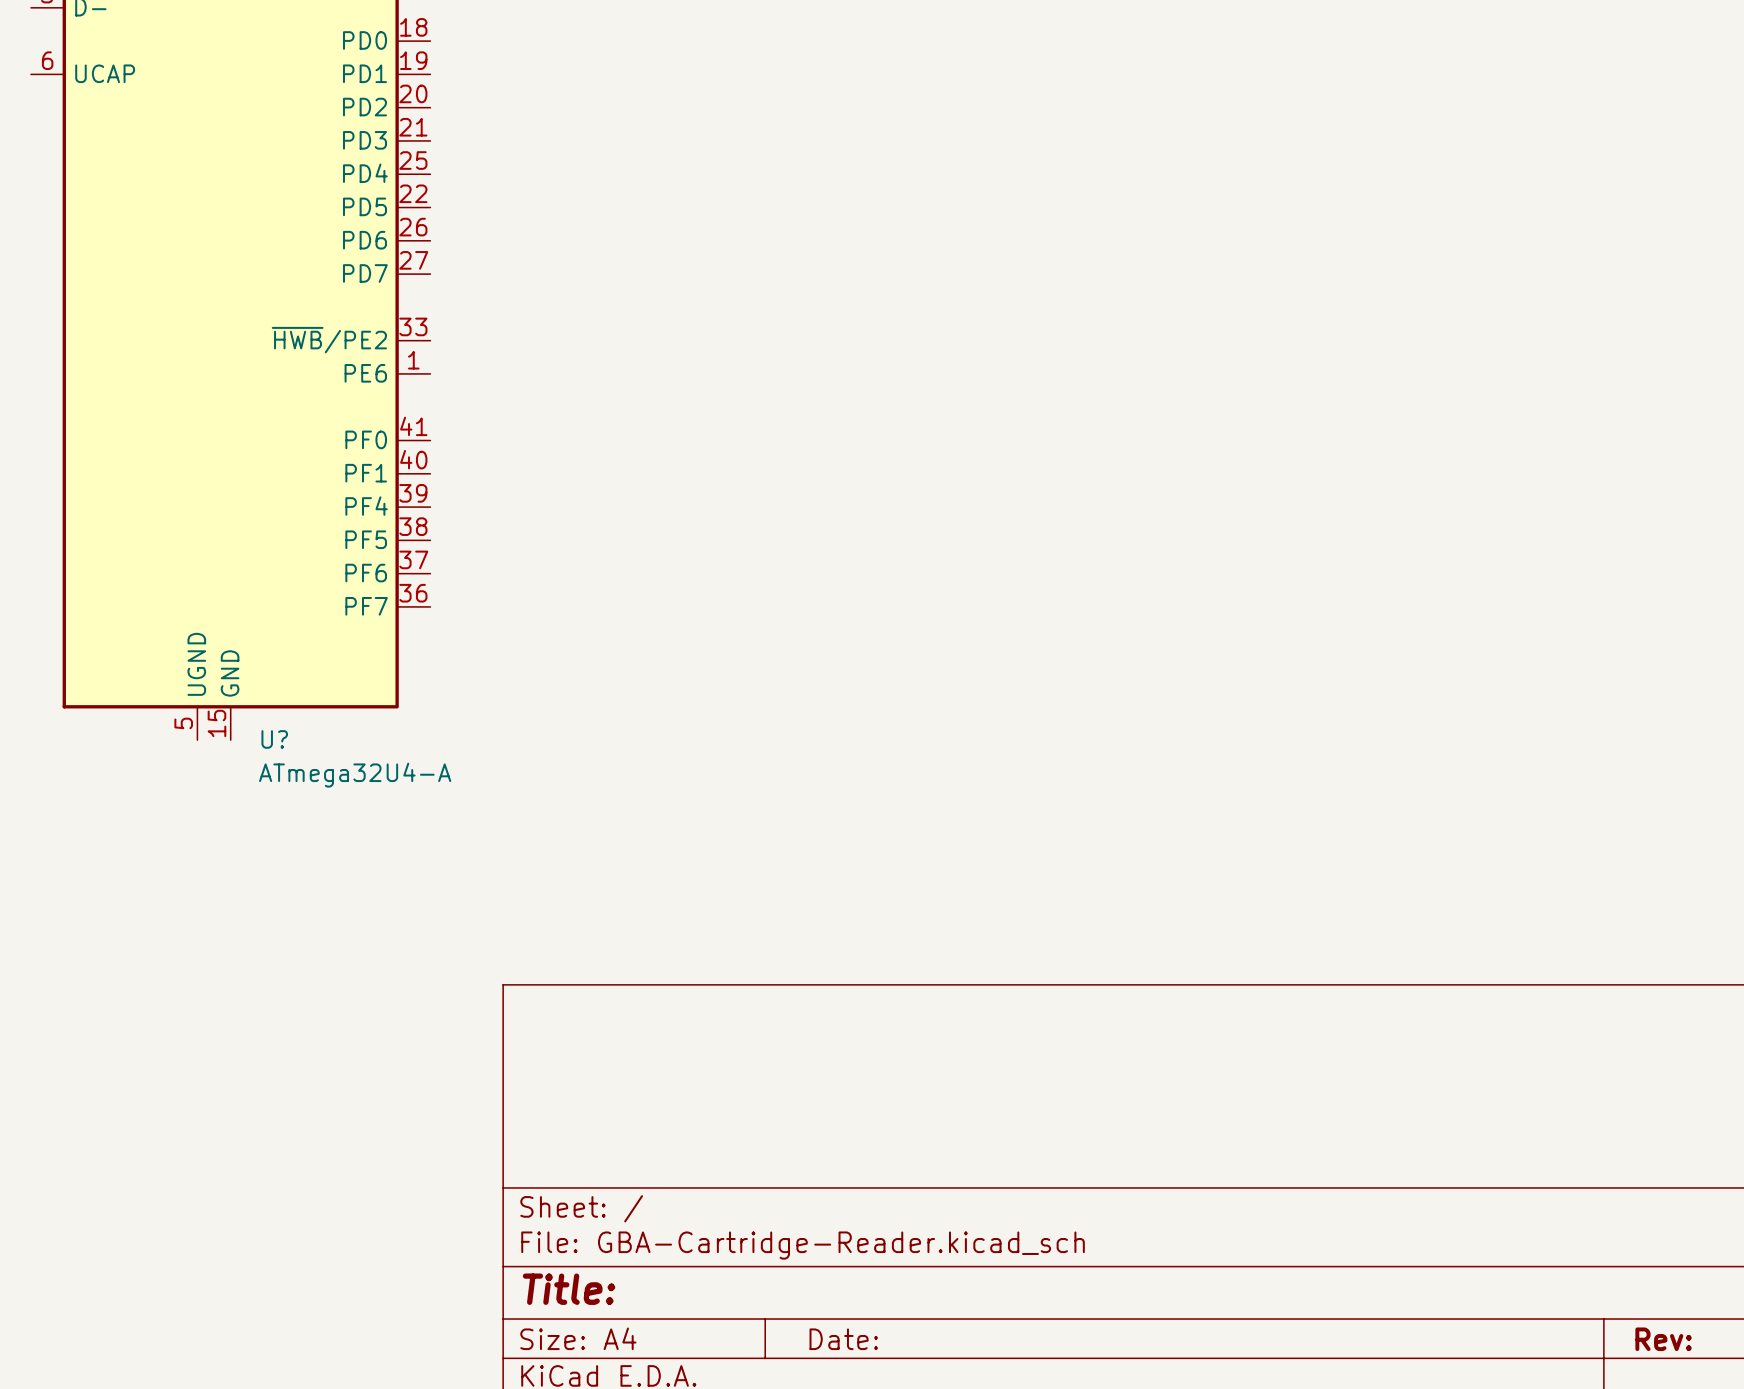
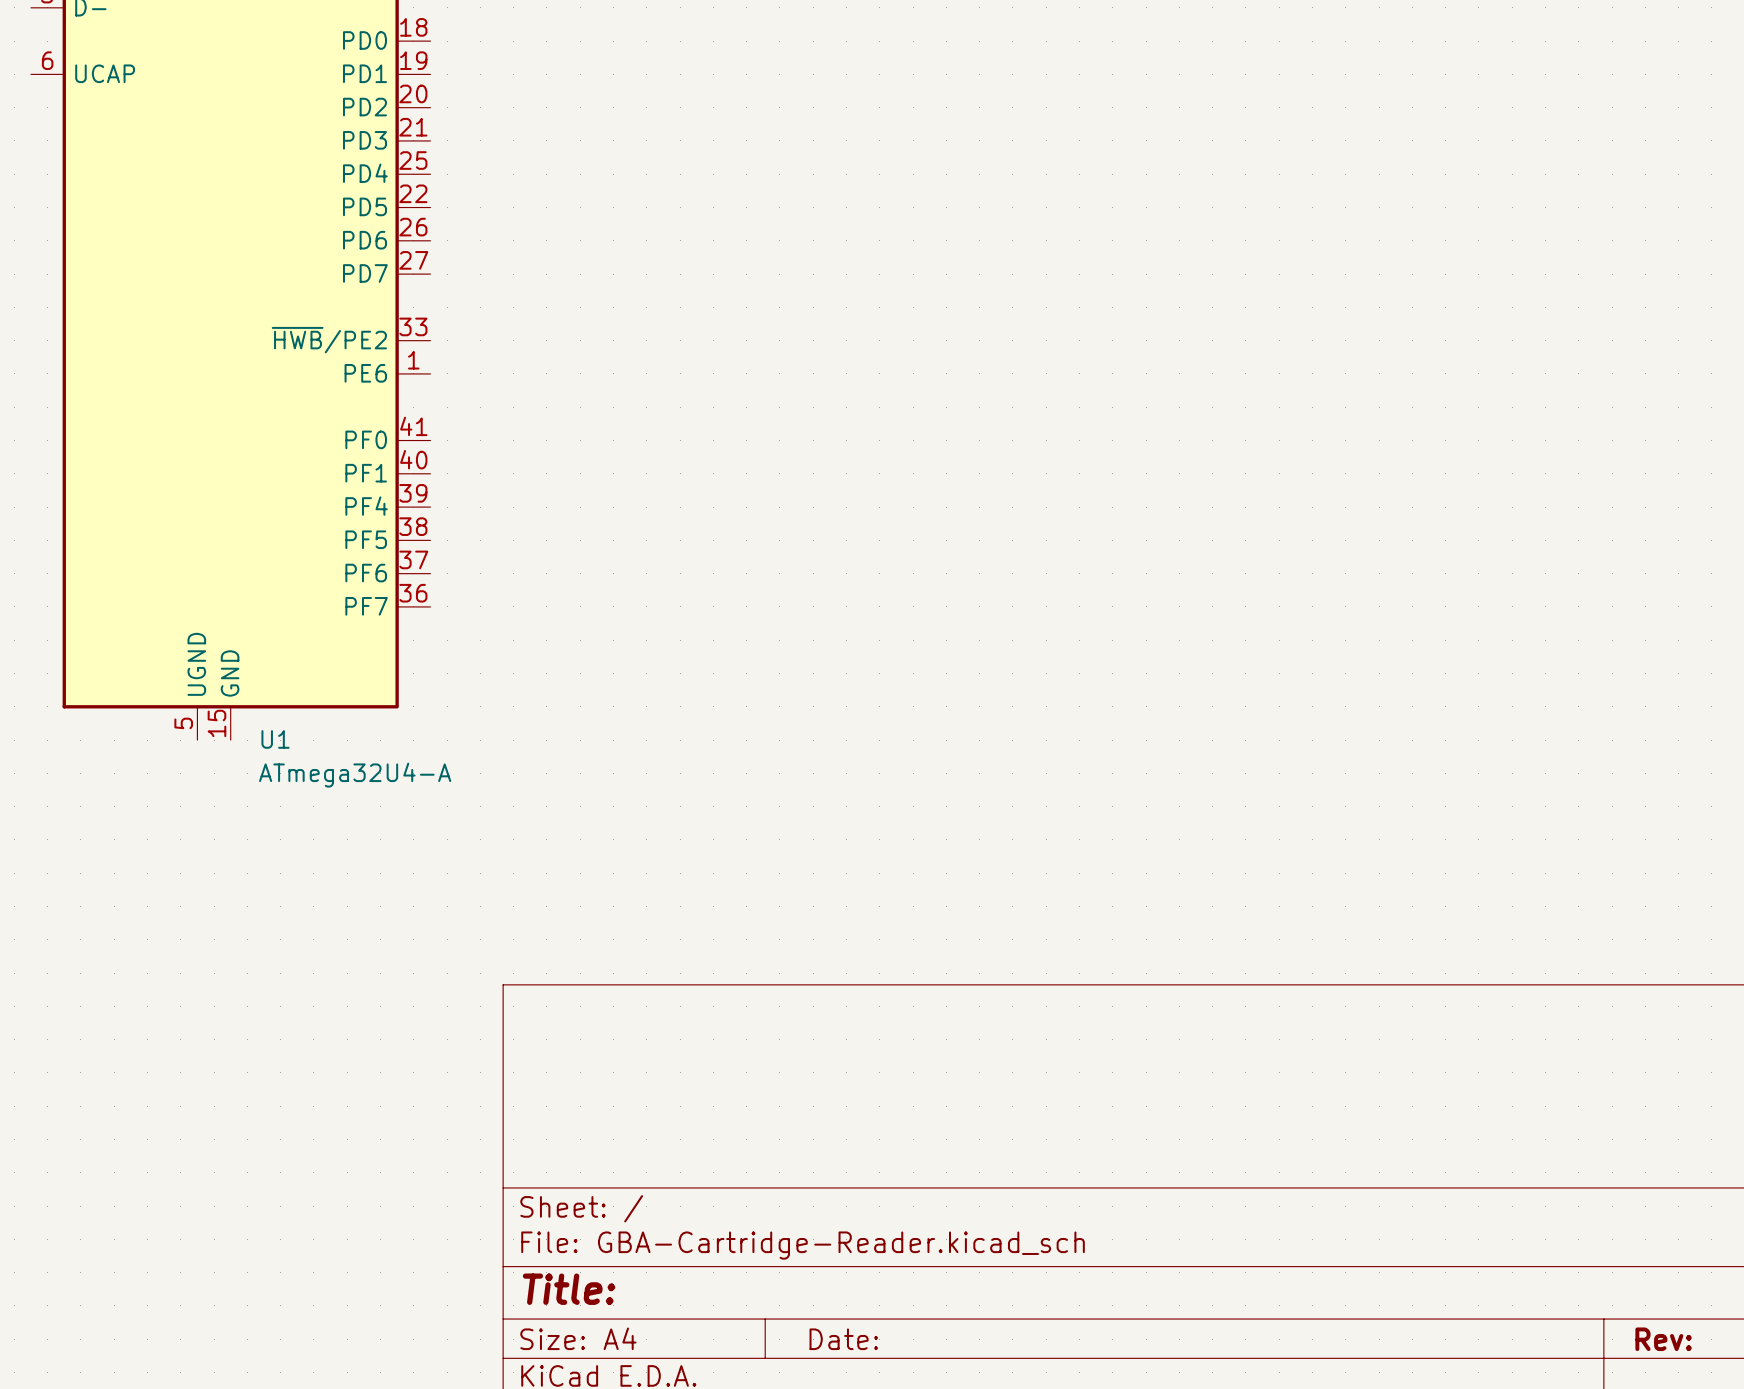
U? name: U? (274, 739) -> U1 (275, 739)

